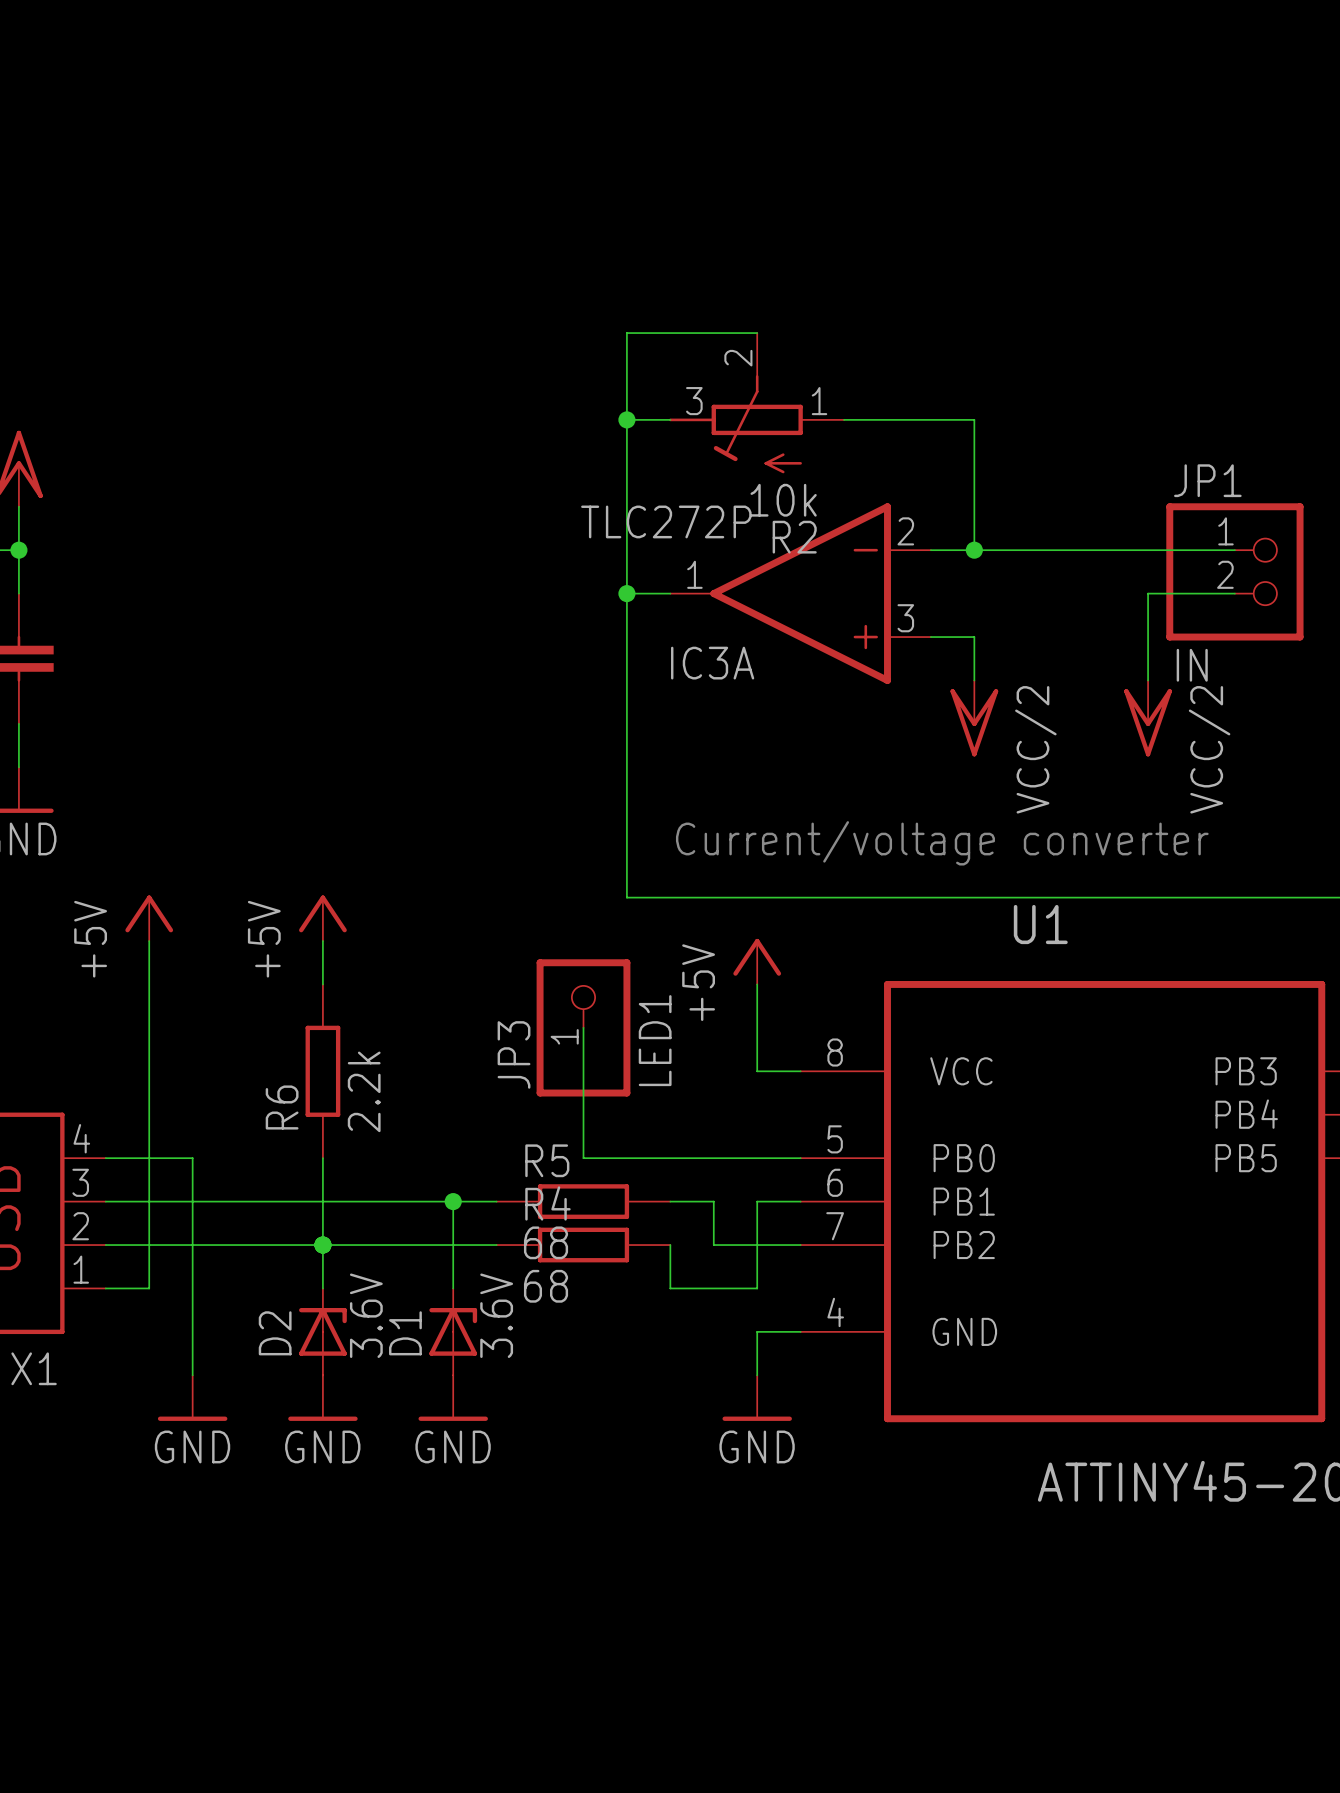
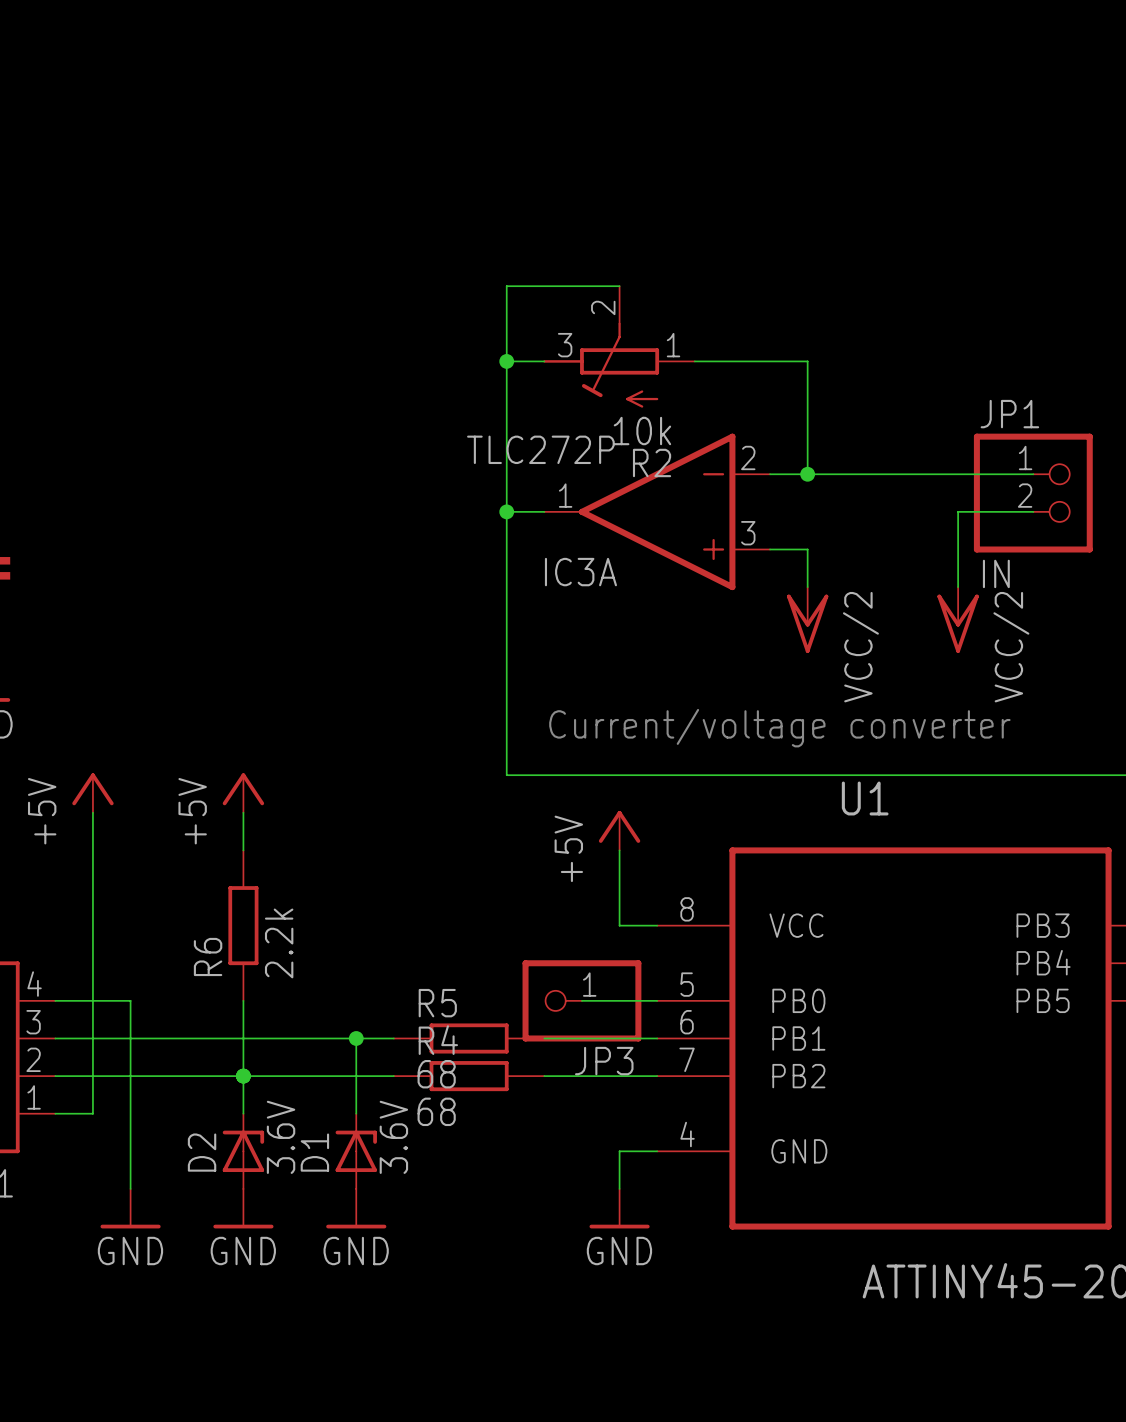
wire: (583, 1027) (583, 1158) (713, 1158) -> none
JP3 rotation: 0° (583, 1027) -> 90° counterclockwise (581, 1000)
JP3 position: (583, 1027) -> (581, 1000)
JP3 value: LED1 (655, 1040) -> none
wire: (713, 1201) (713, 1245) -> (581, 1038) (619, 1038)
wire: (757, 1201) (757, 1288) (670, 1288) (670, 1245) -> (581, 1076) (544, 1076)

